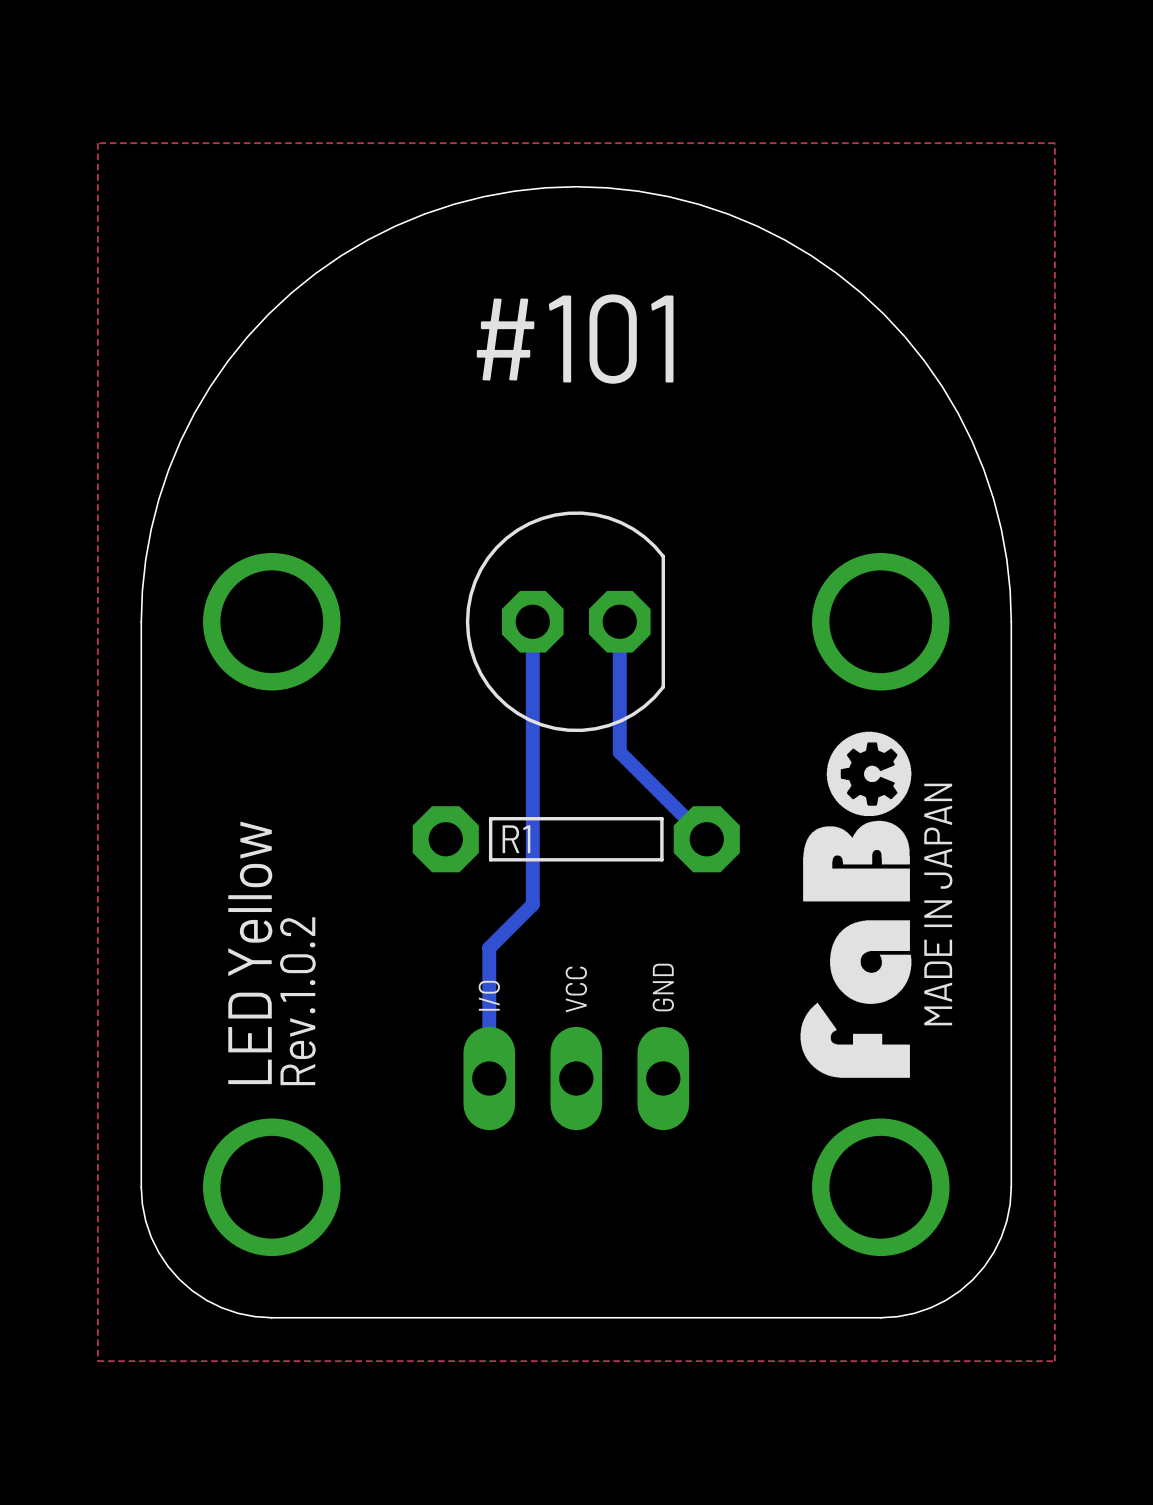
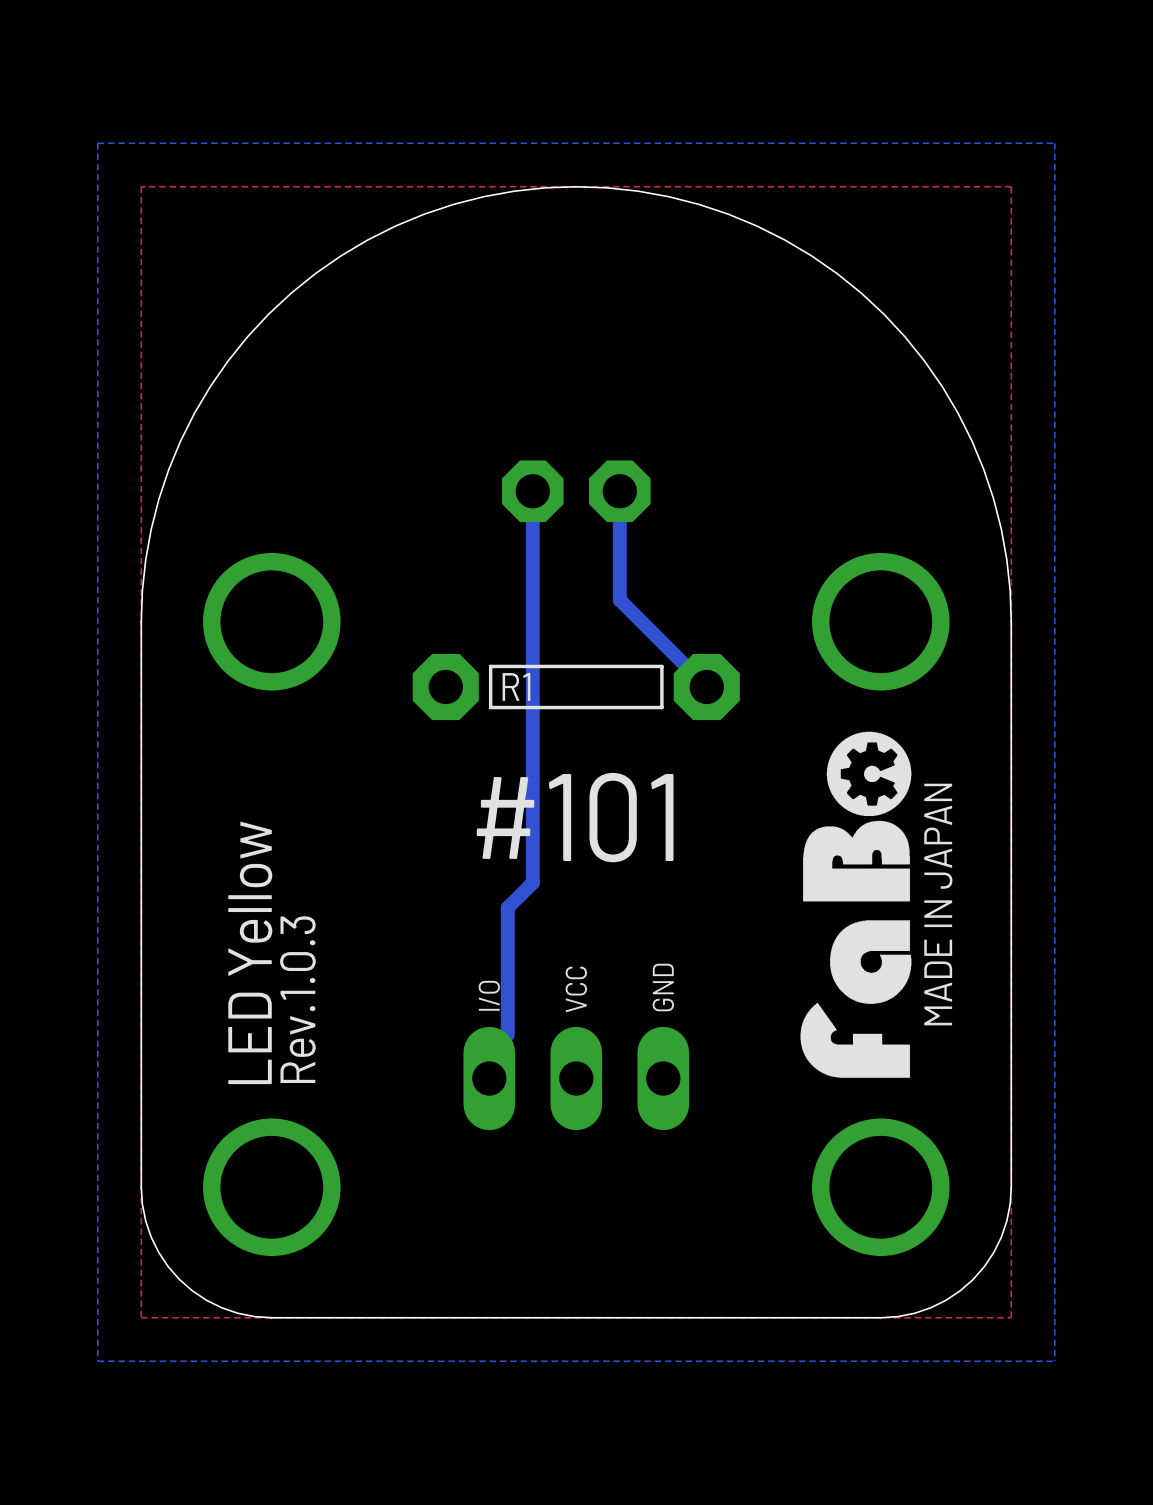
top zone outline: (97, 143) (1054, 143) (1054, 1361) (97, 1361) (97, 143) -> (141, 186) (141, 1317) (1011, 1317) (1011, 186) (141, 186)
text position: #101 (575, 339) -> #101 (575, 817)
bottom track: none -> (532, 491) (532, 621)
part: none -> (576, 491)
bottom track: none -> (619, 491) (619, 600) (706, 687)
part: (565, 621) -> none
bottom track: (619, 621) (619, 752) (706, 839) -> none
R1 position: (576, 839) -> (576, 687)
bottom track: (532, 882) (532, 904) (489, 948) (489, 1078) -> (532, 882) (507, 907) (507, 1035)
text: Rev.1.0.2 (297, 1001) -> Rev.1.0.3 (297, 999)

